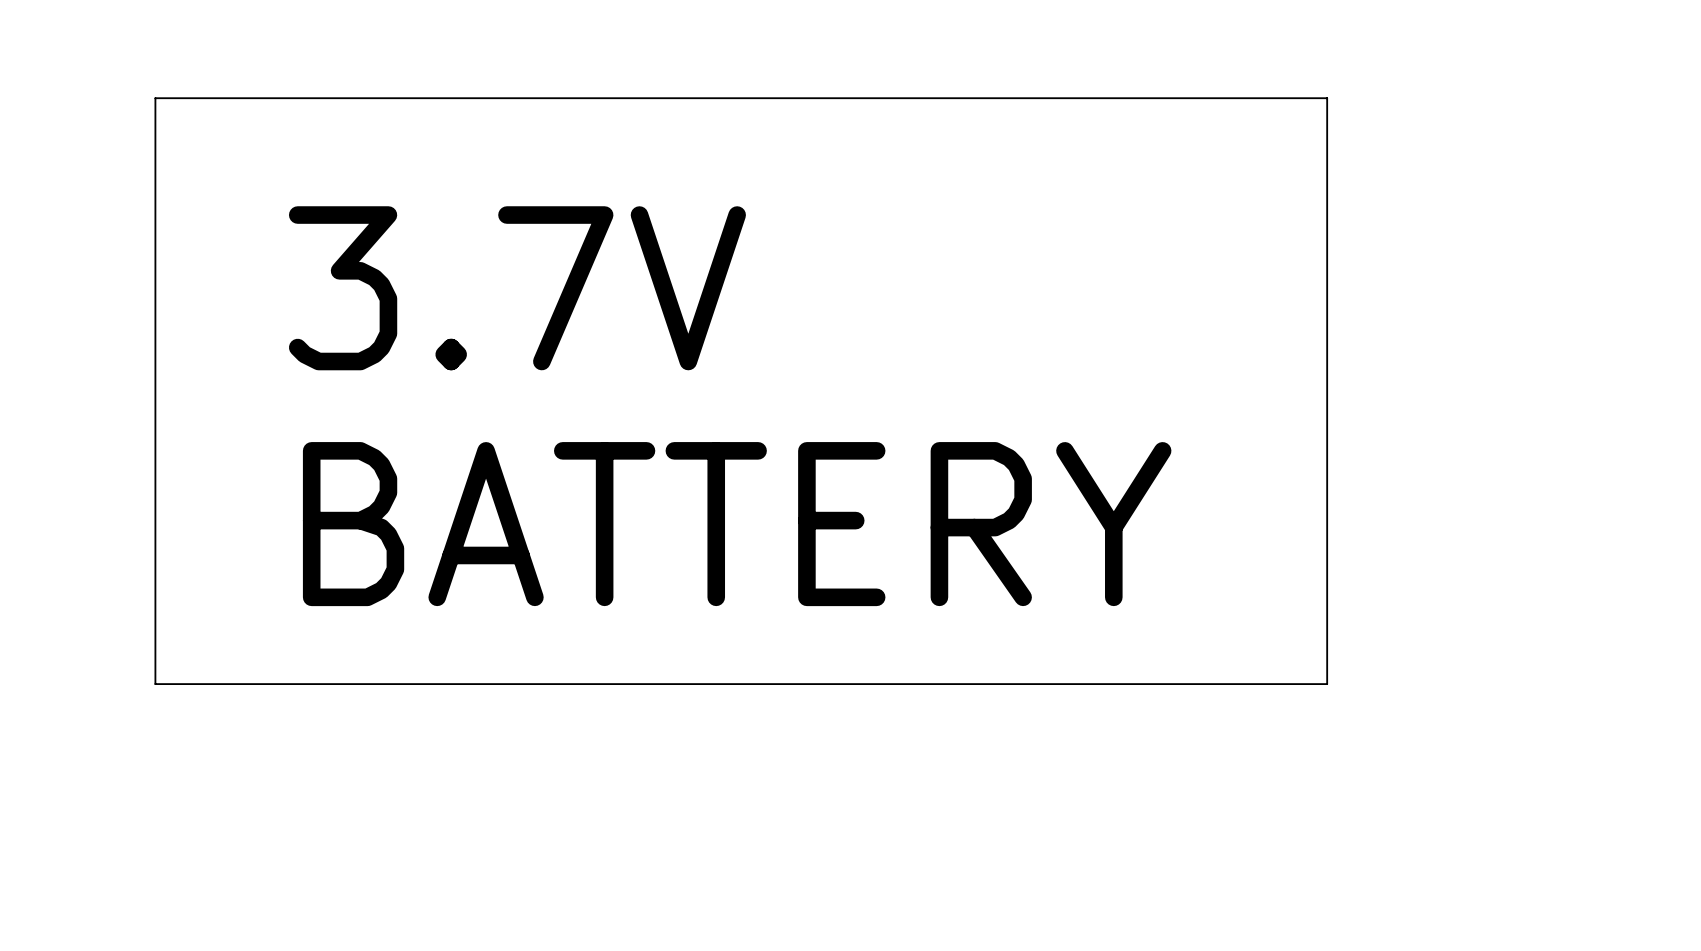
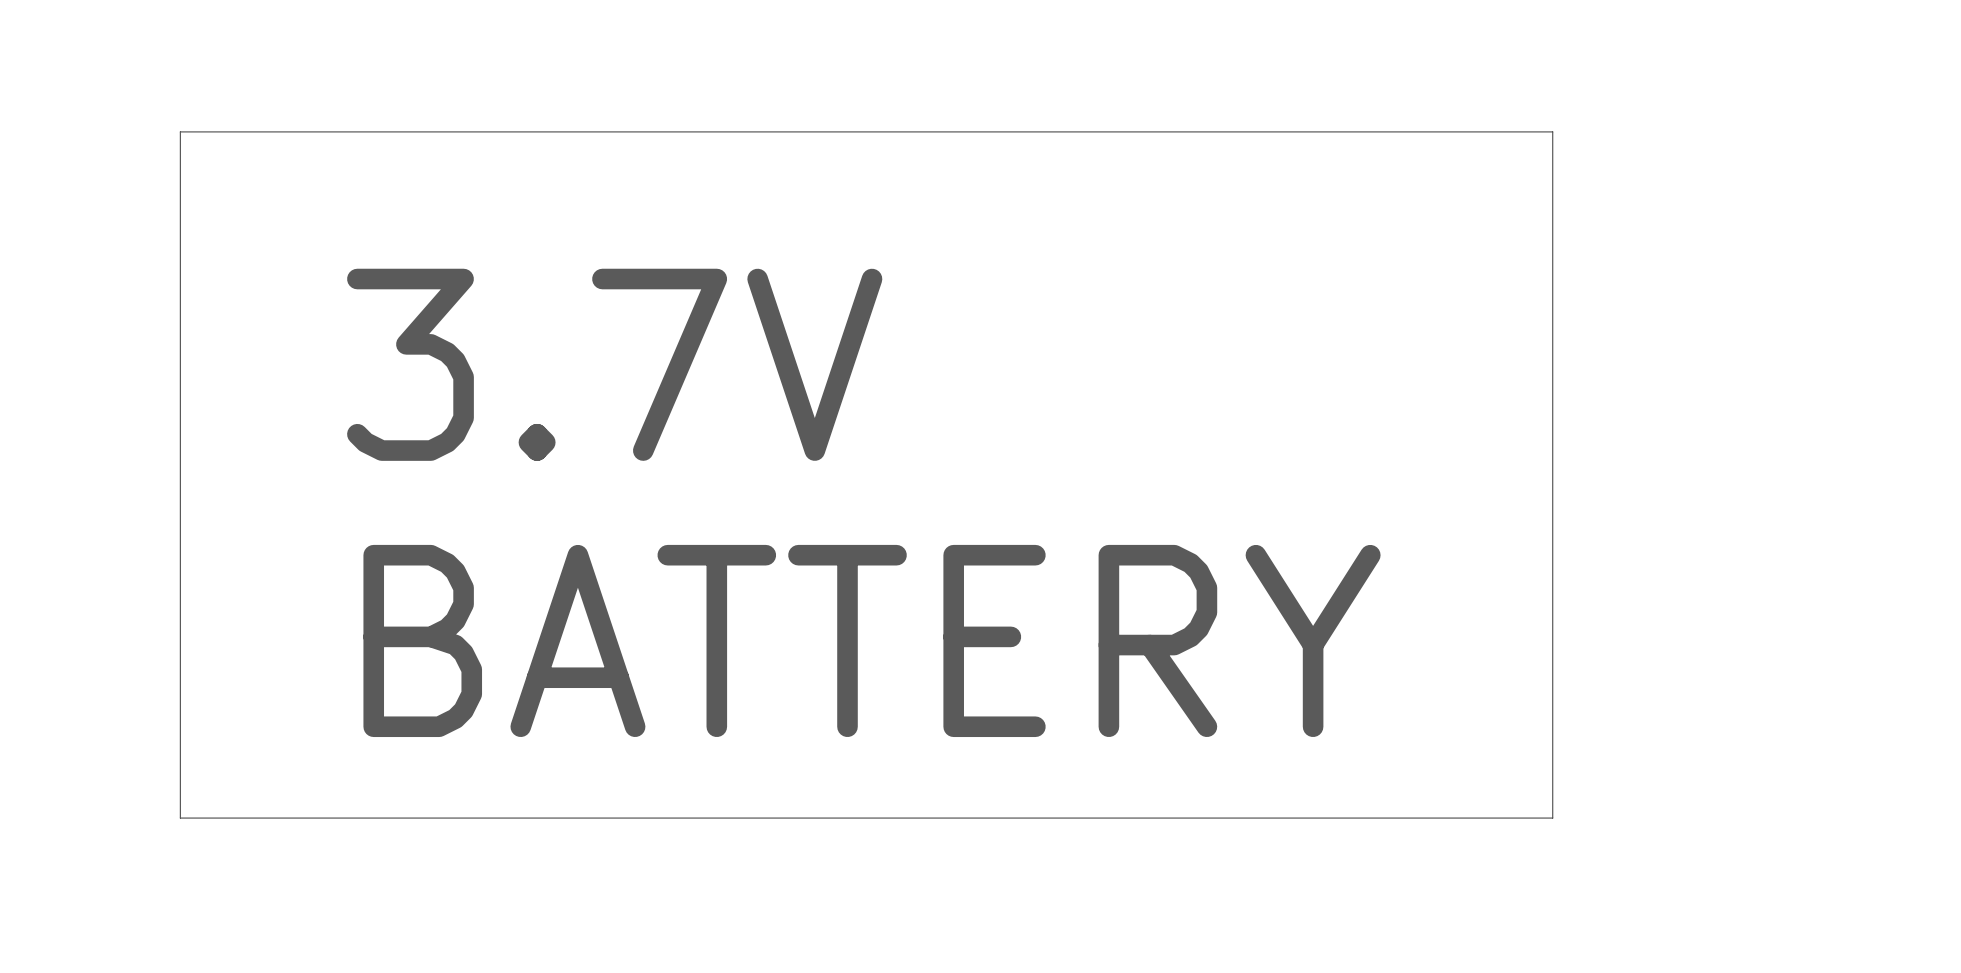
text position: 3.7V (517, 288) -> 3.7V (614, 364)
text position: BATTERY (737, 524) -> BATTERY (872, 640)

